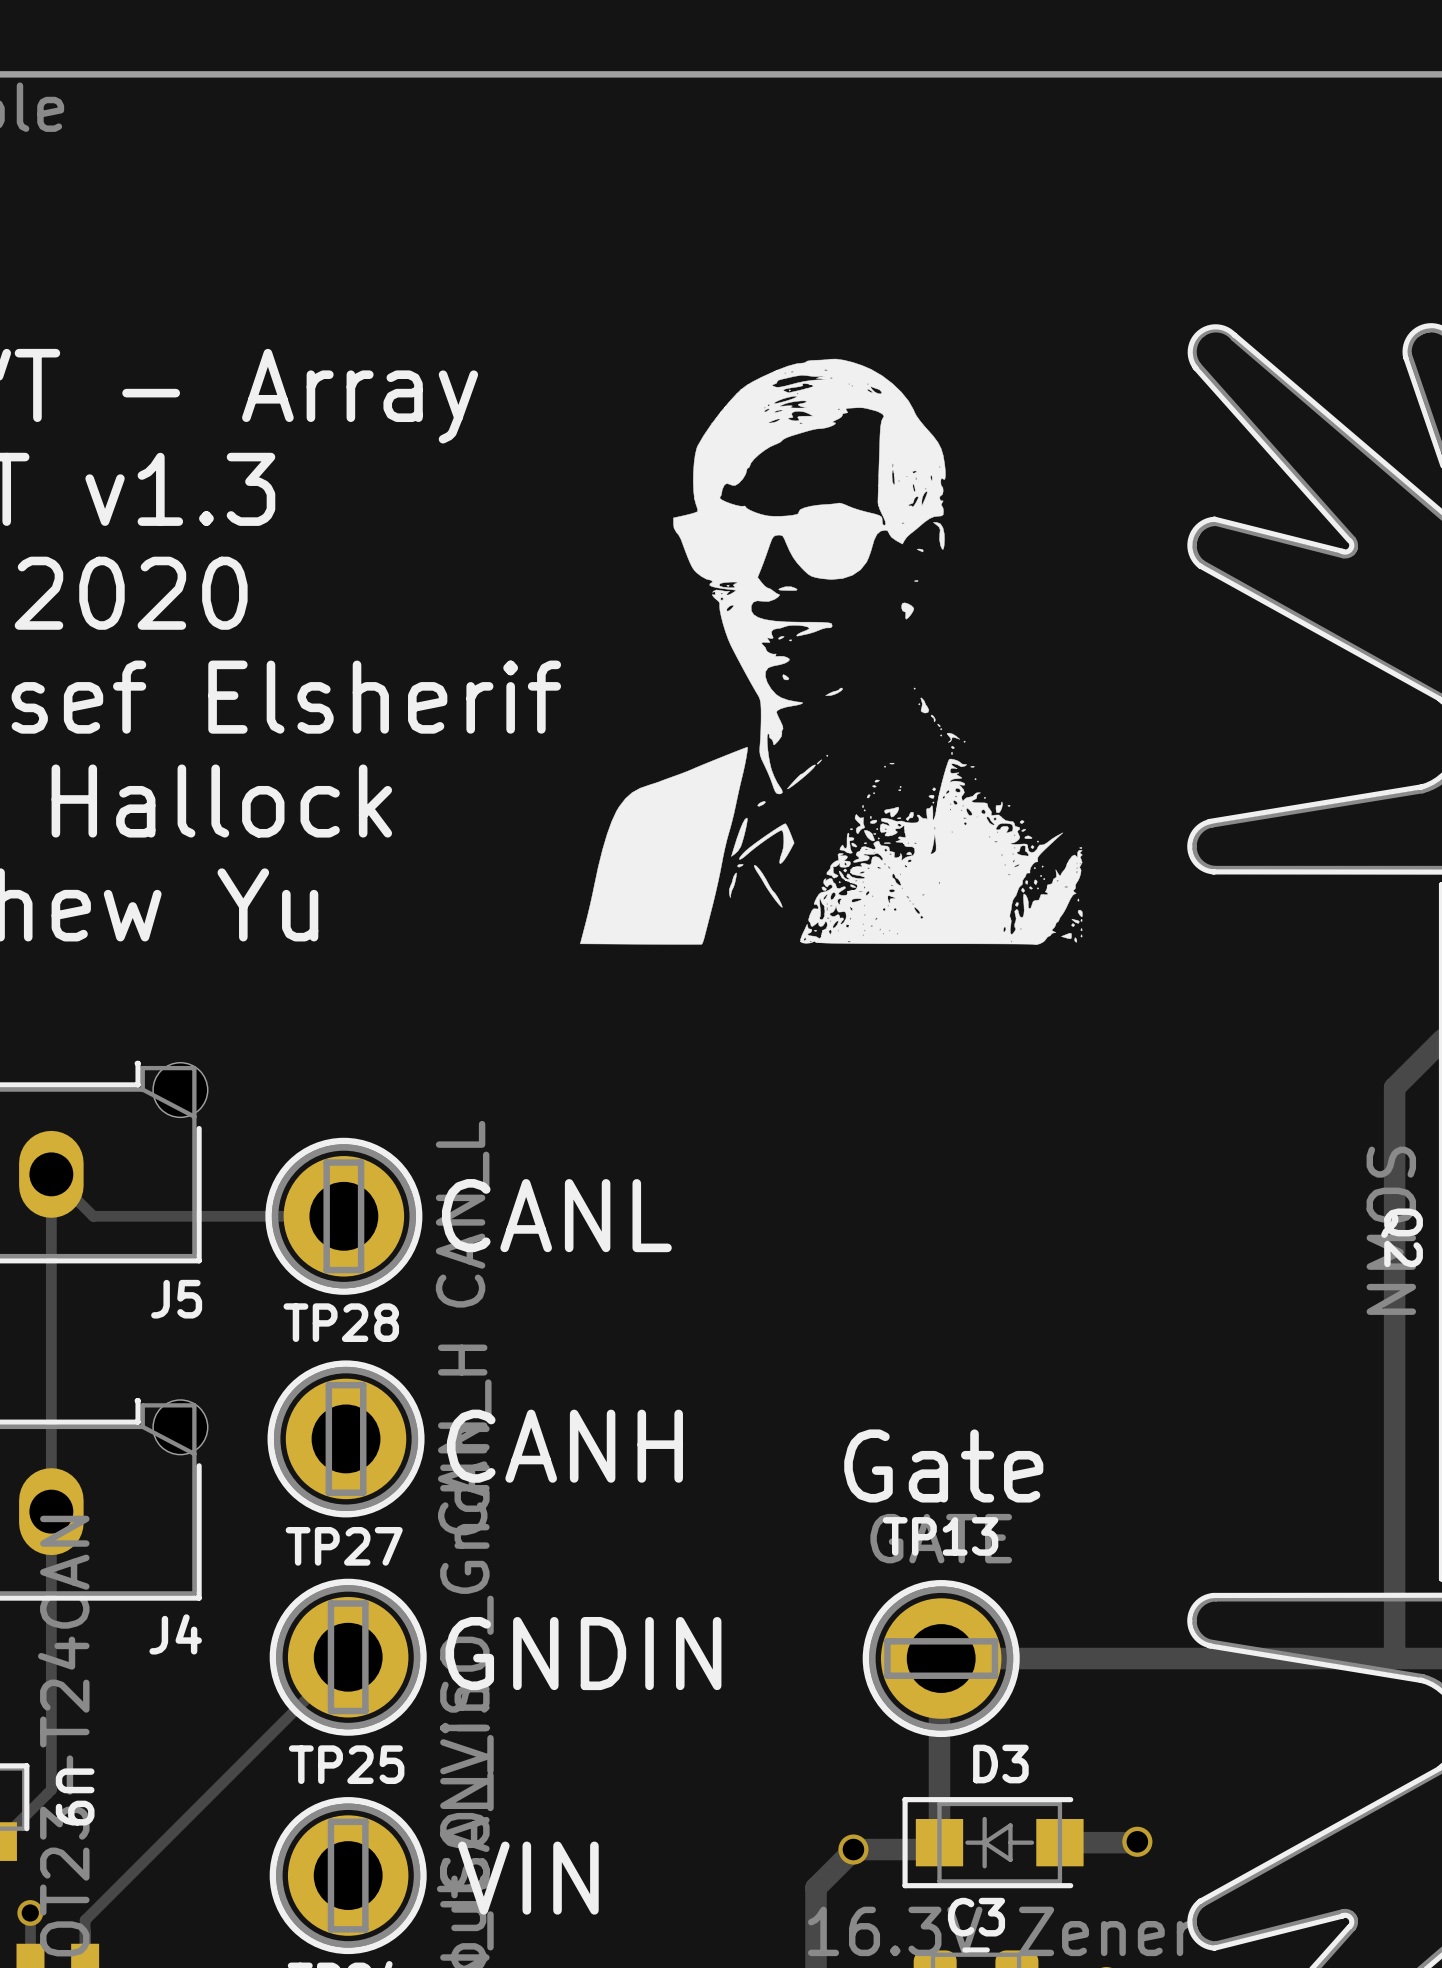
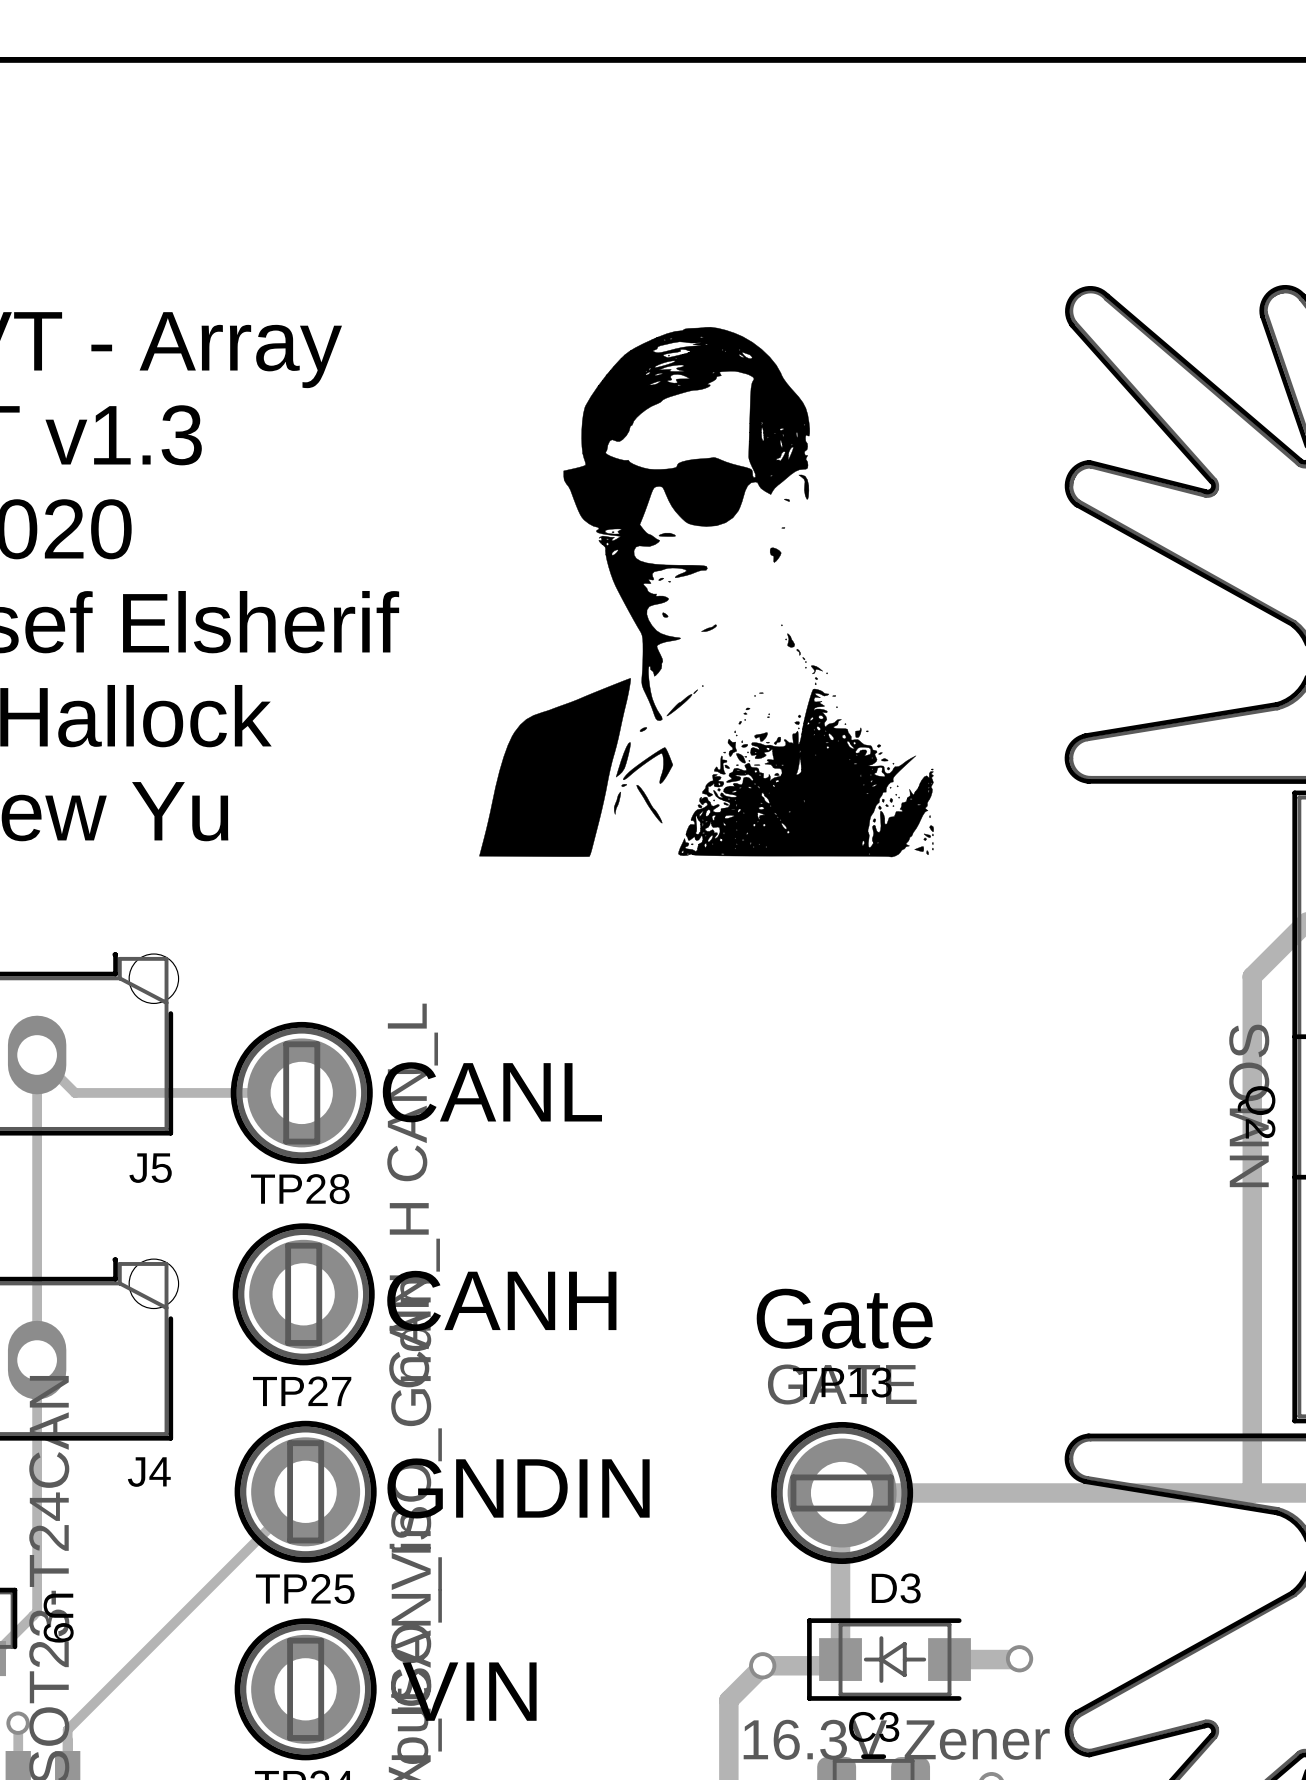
drawing position: (831, 651) -> (706, 592)

